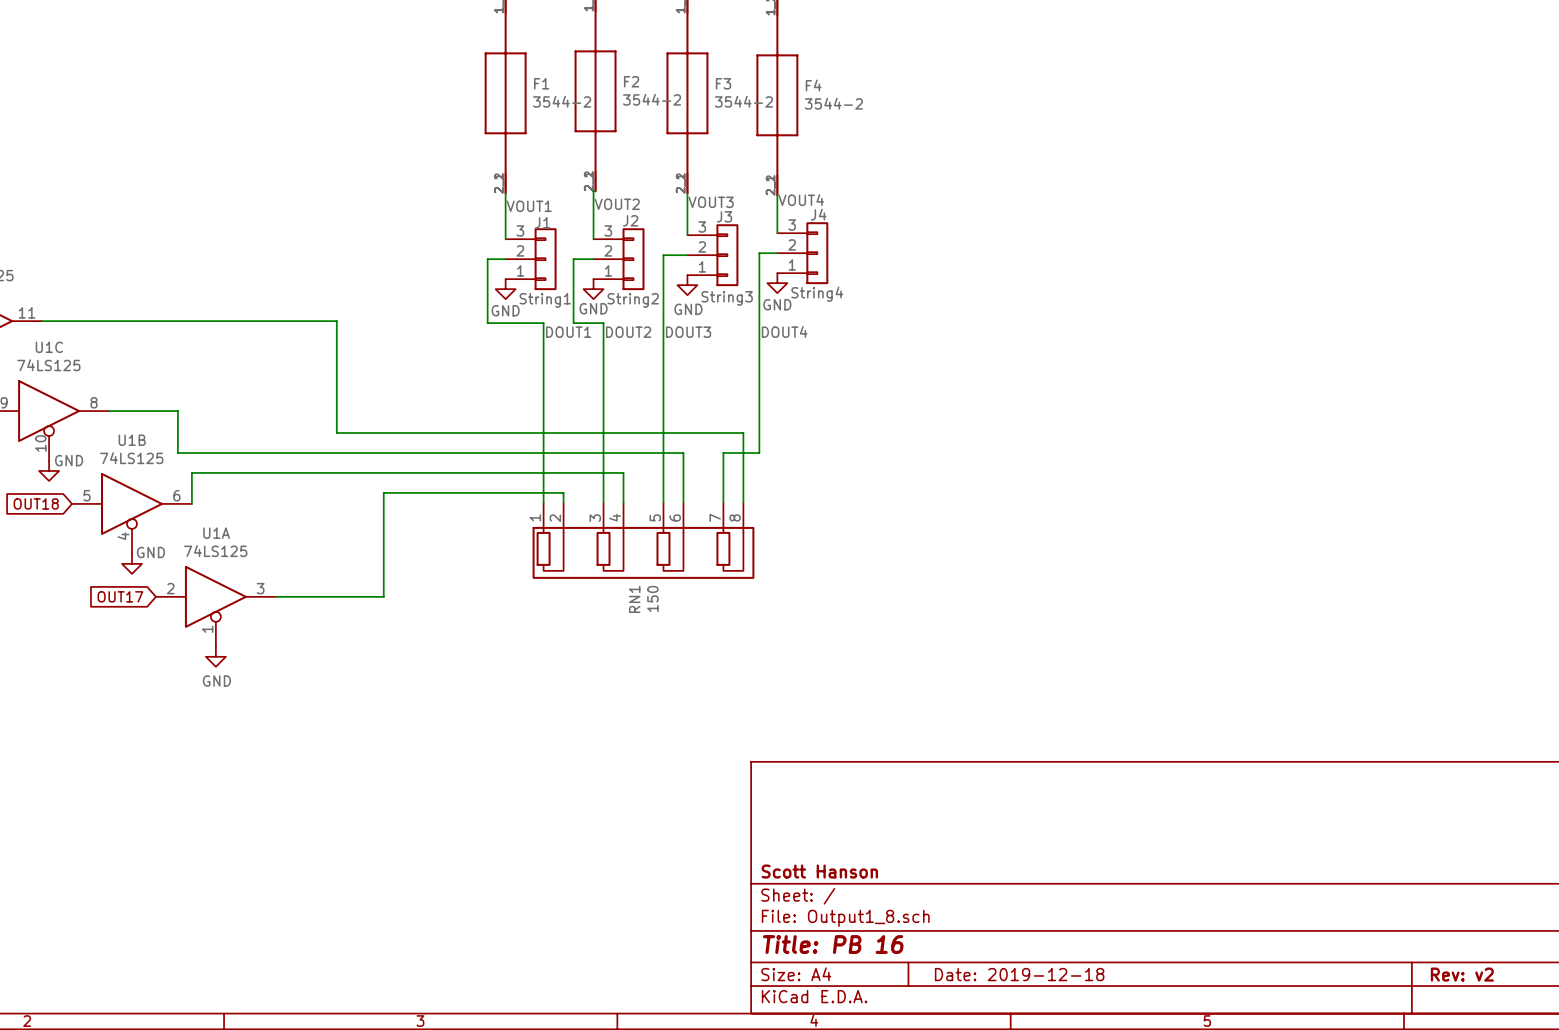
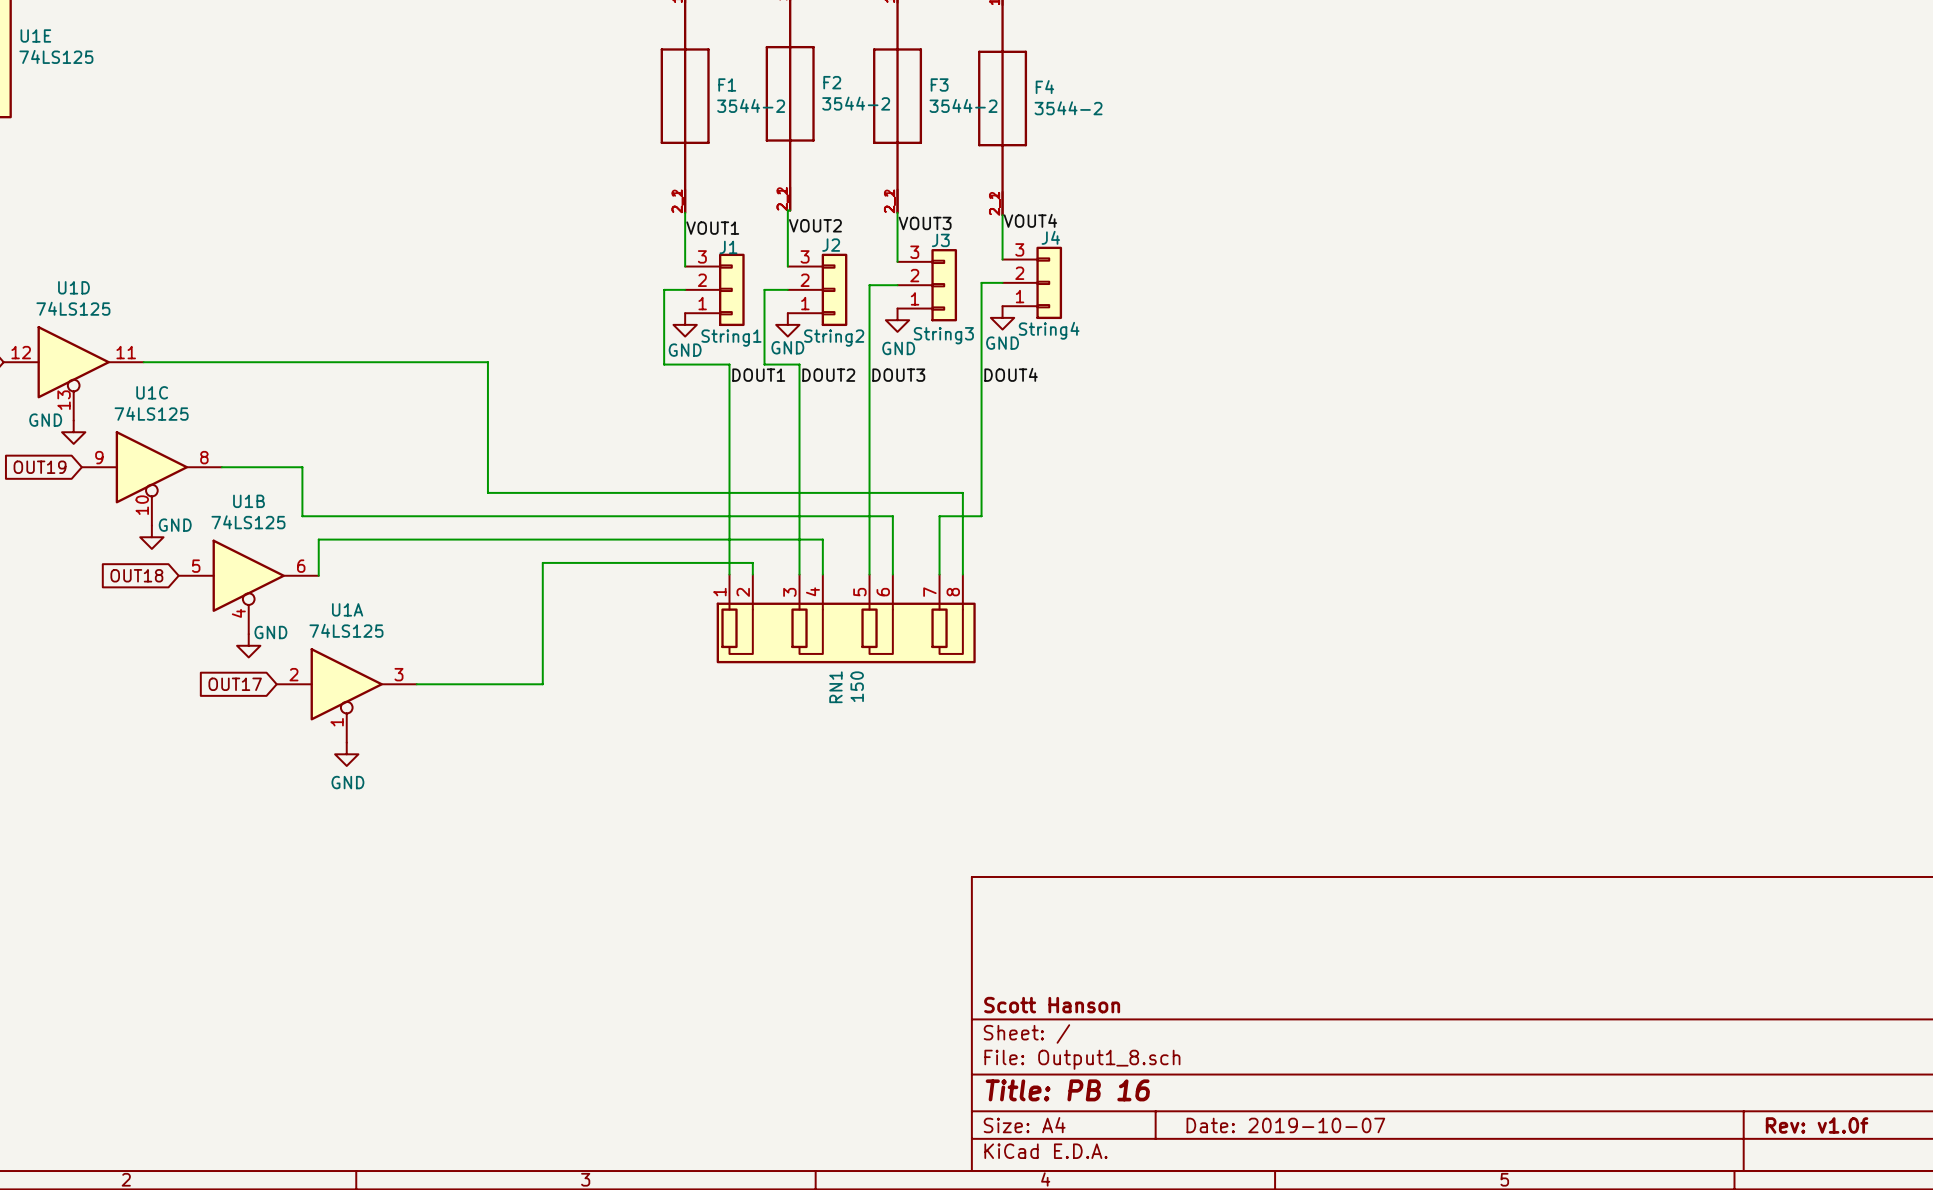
title block: Date: 2019-12-18 (1019, 974) -> Date: 2019-10-07 (1285, 1125)
title block: Rev: v2 (1462, 974) -> Rev: v1.0f (1817, 1125)

